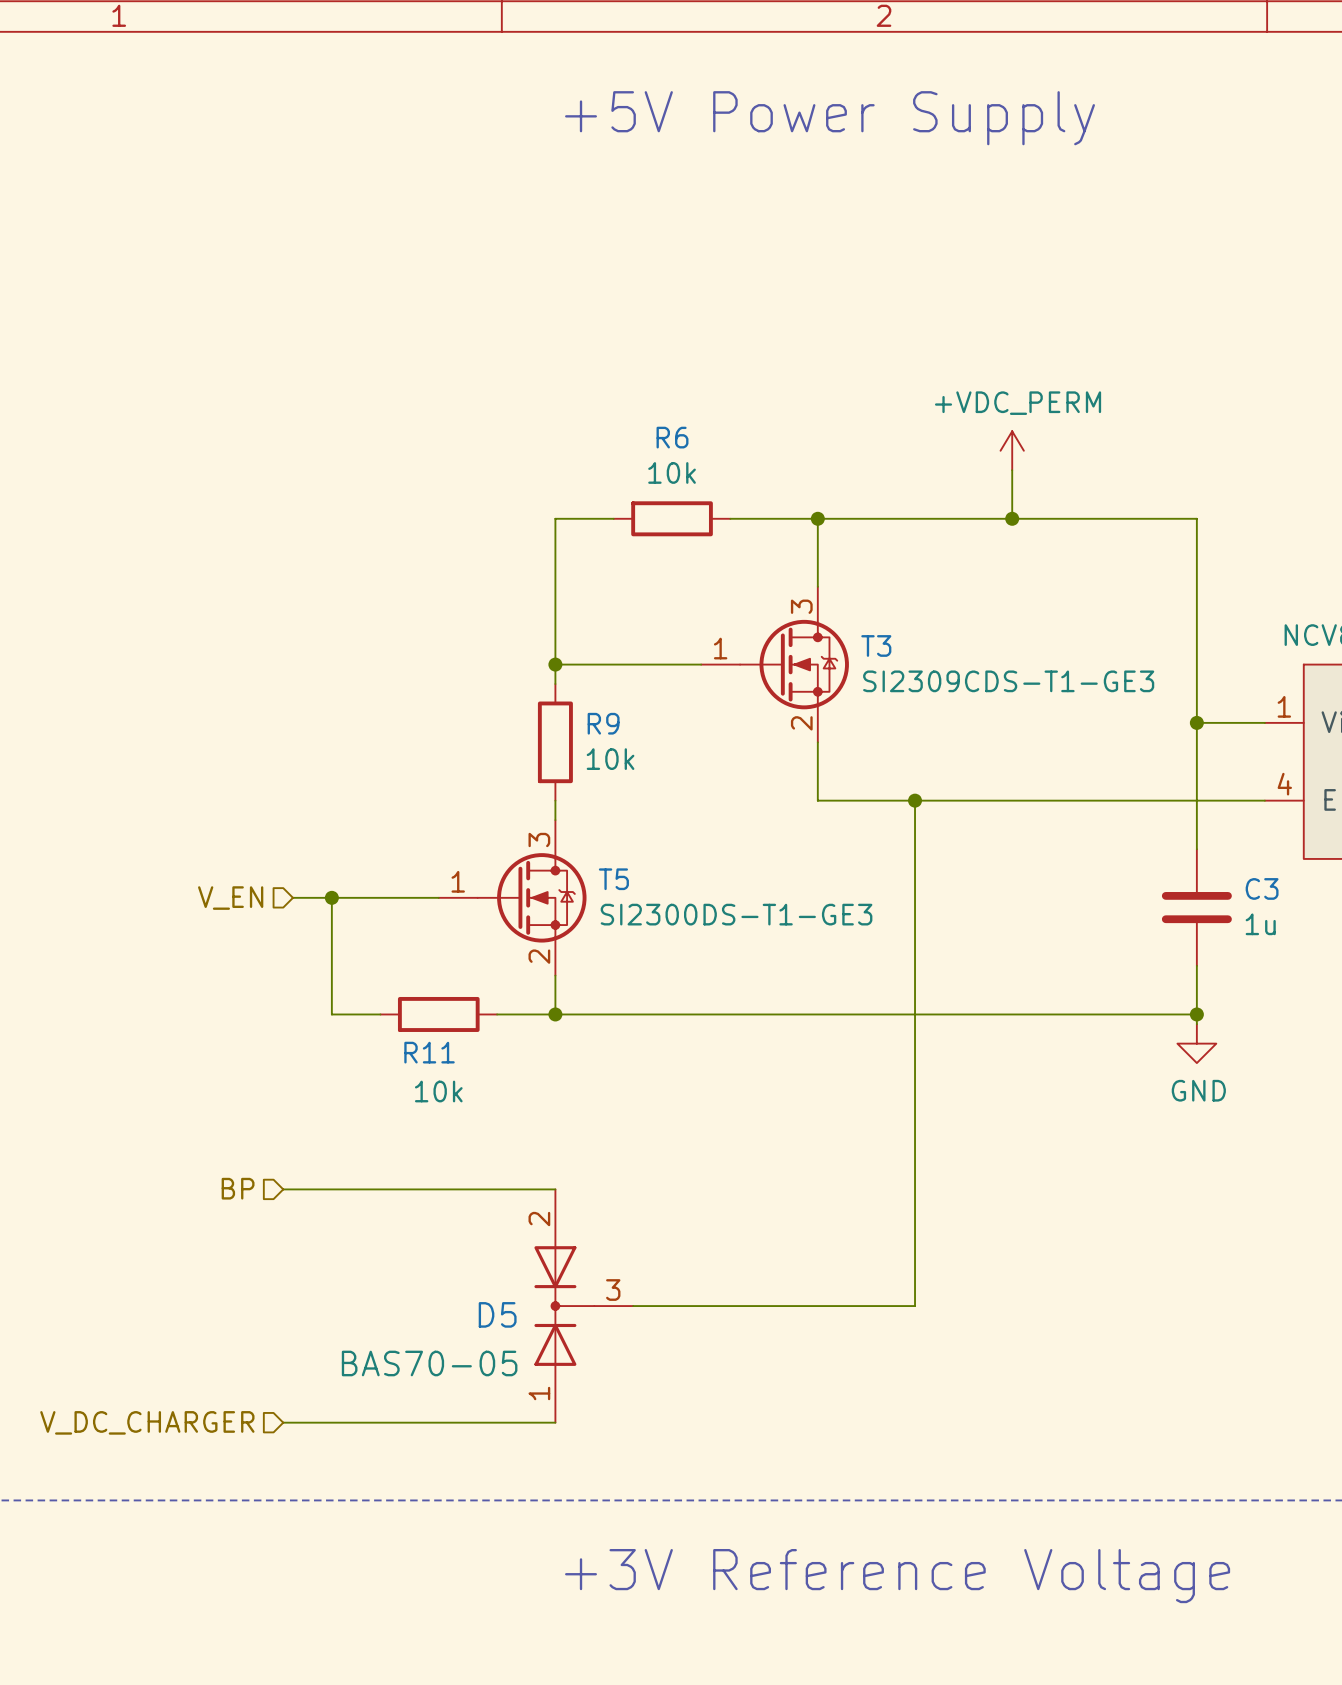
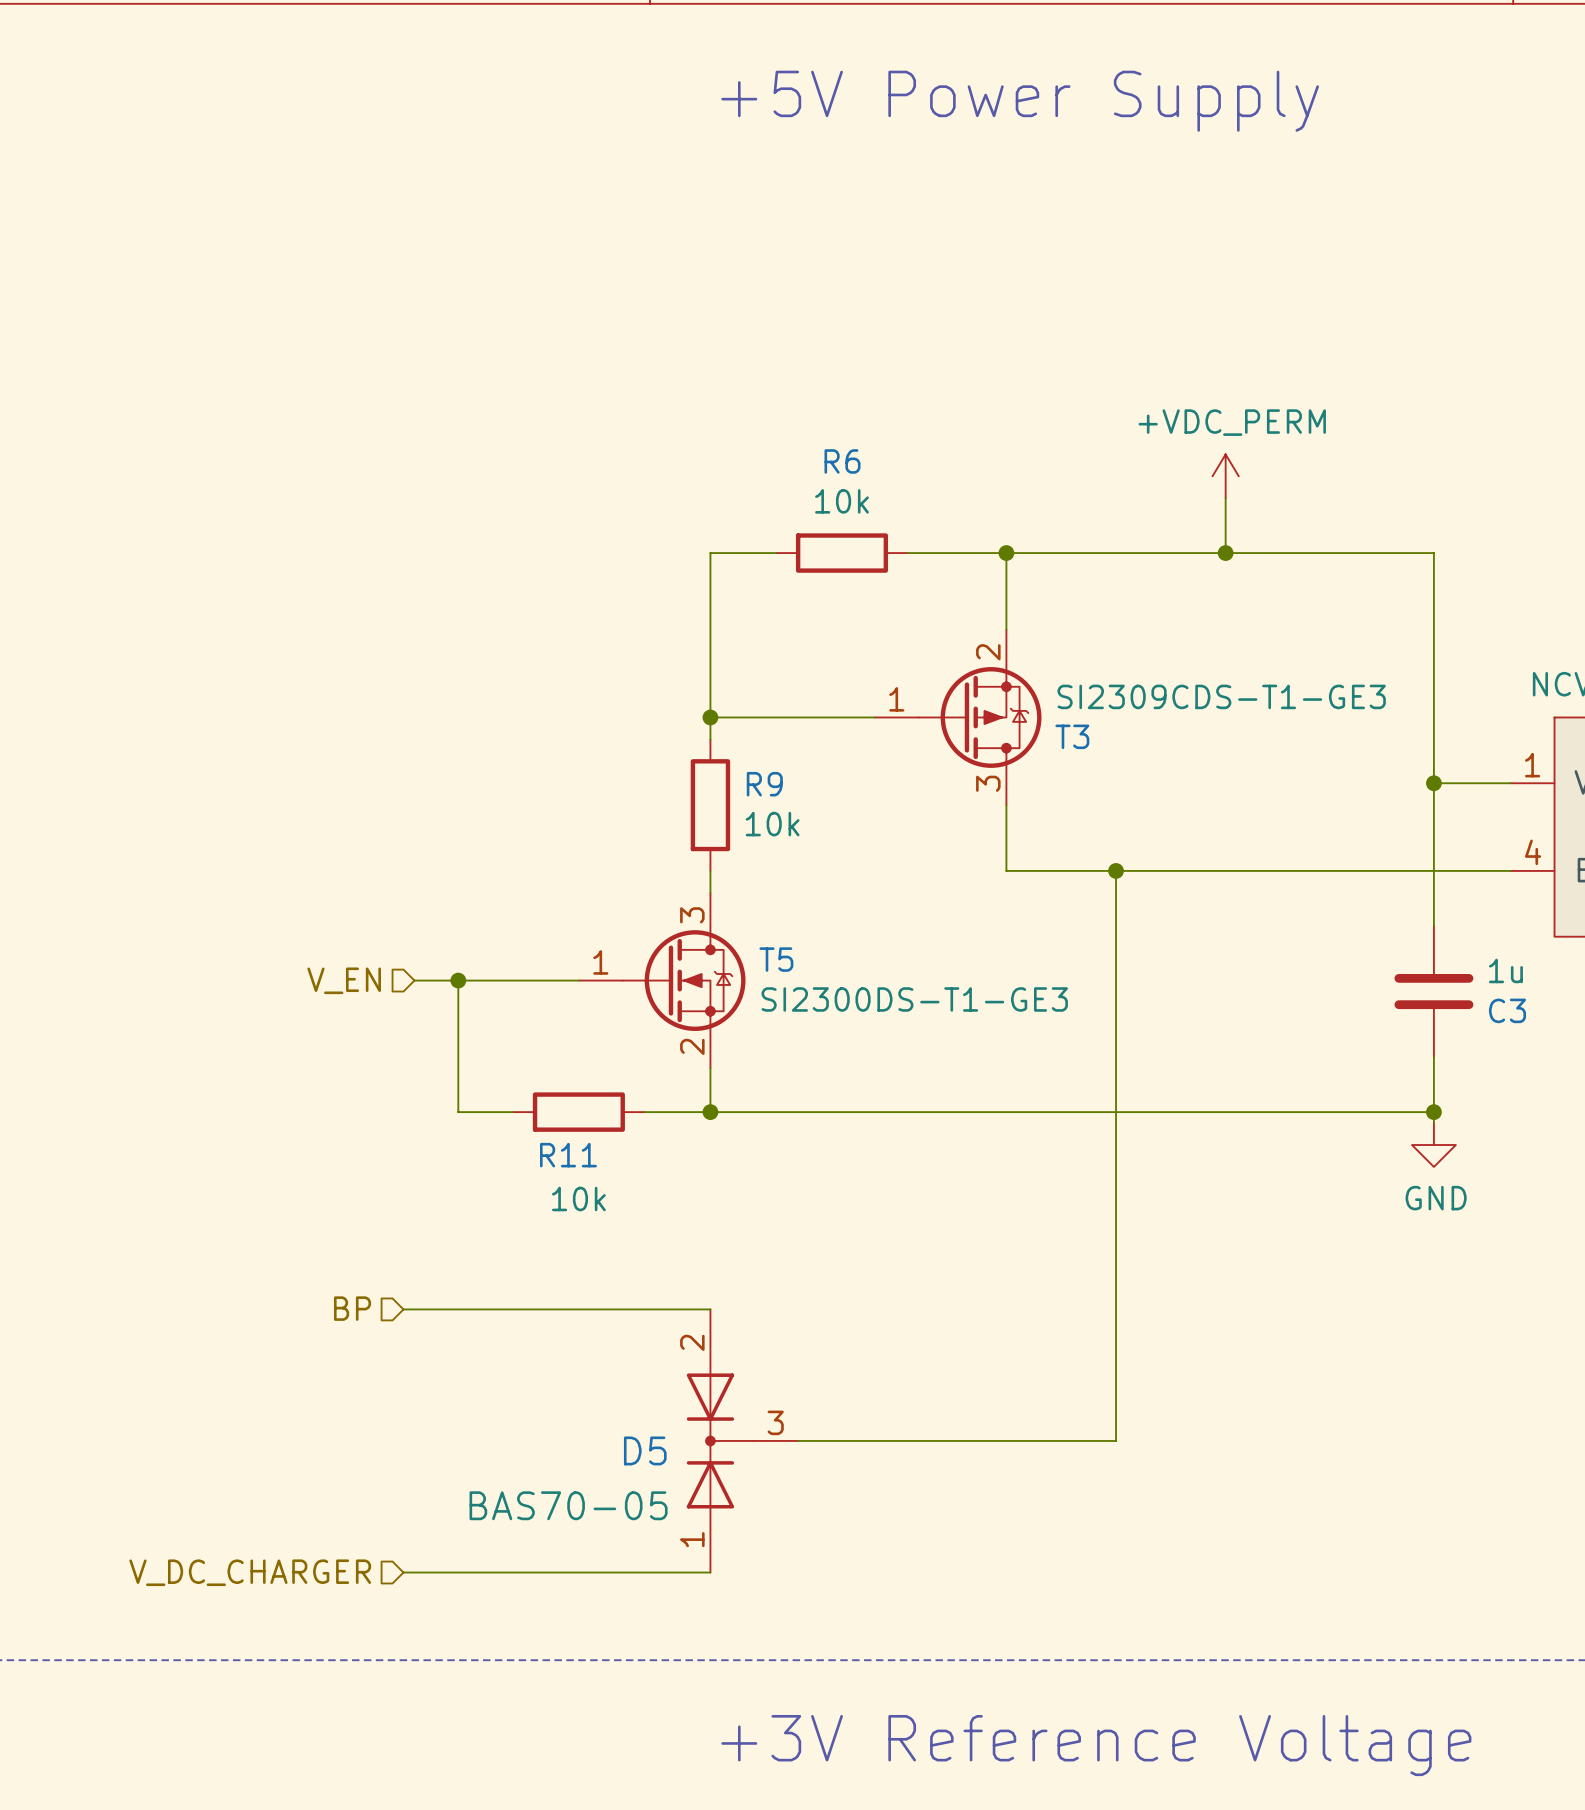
T3 symbol: [701, 586, 849, 743] -> [874, 629, 1042, 806]
T3 name position: T3 (876, 645) -> T3 (1072, 736)
T3 value position: SI2309CDS-T1-GE3 (1008, 681) -> SI2309CDS-T1-GE3 (1221, 696)
C3 name position: C3 (1262, 888) -> C3 (1507, 1010)
C3 value position: 1u (1260, 924) -> 1u (1505, 970)

